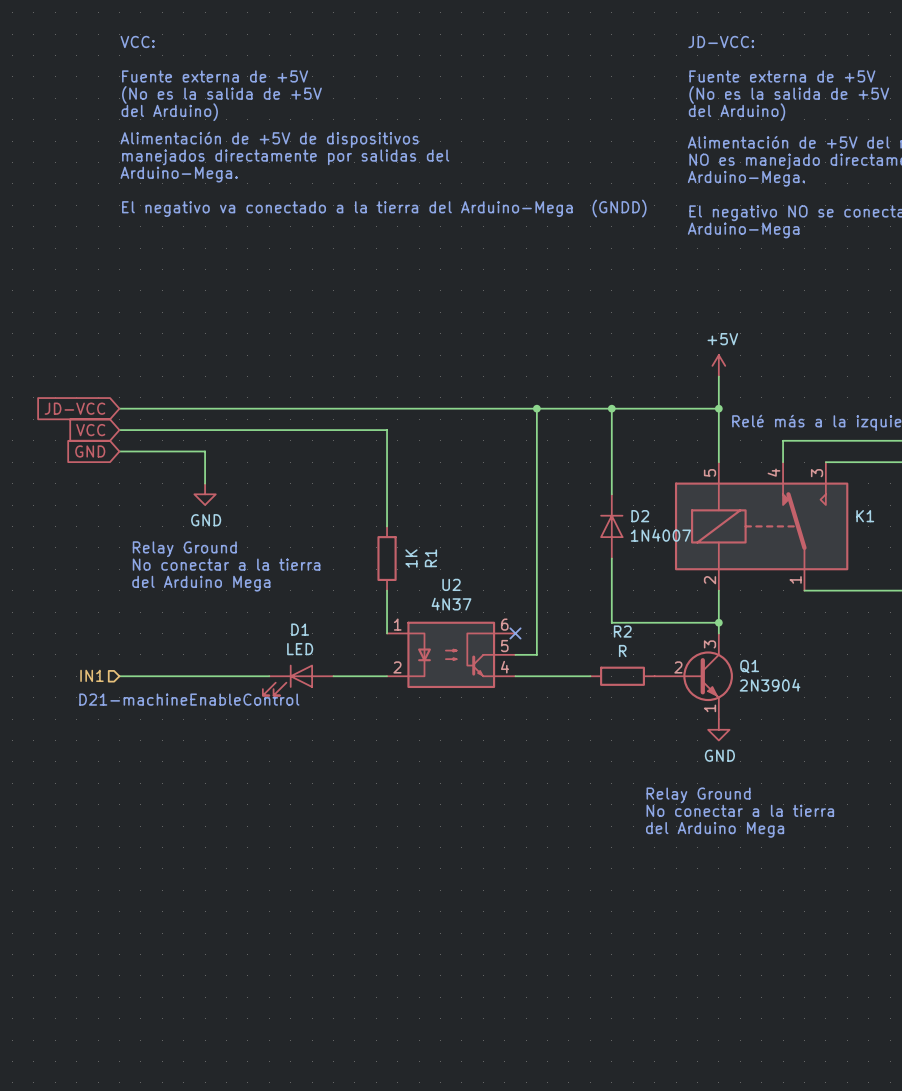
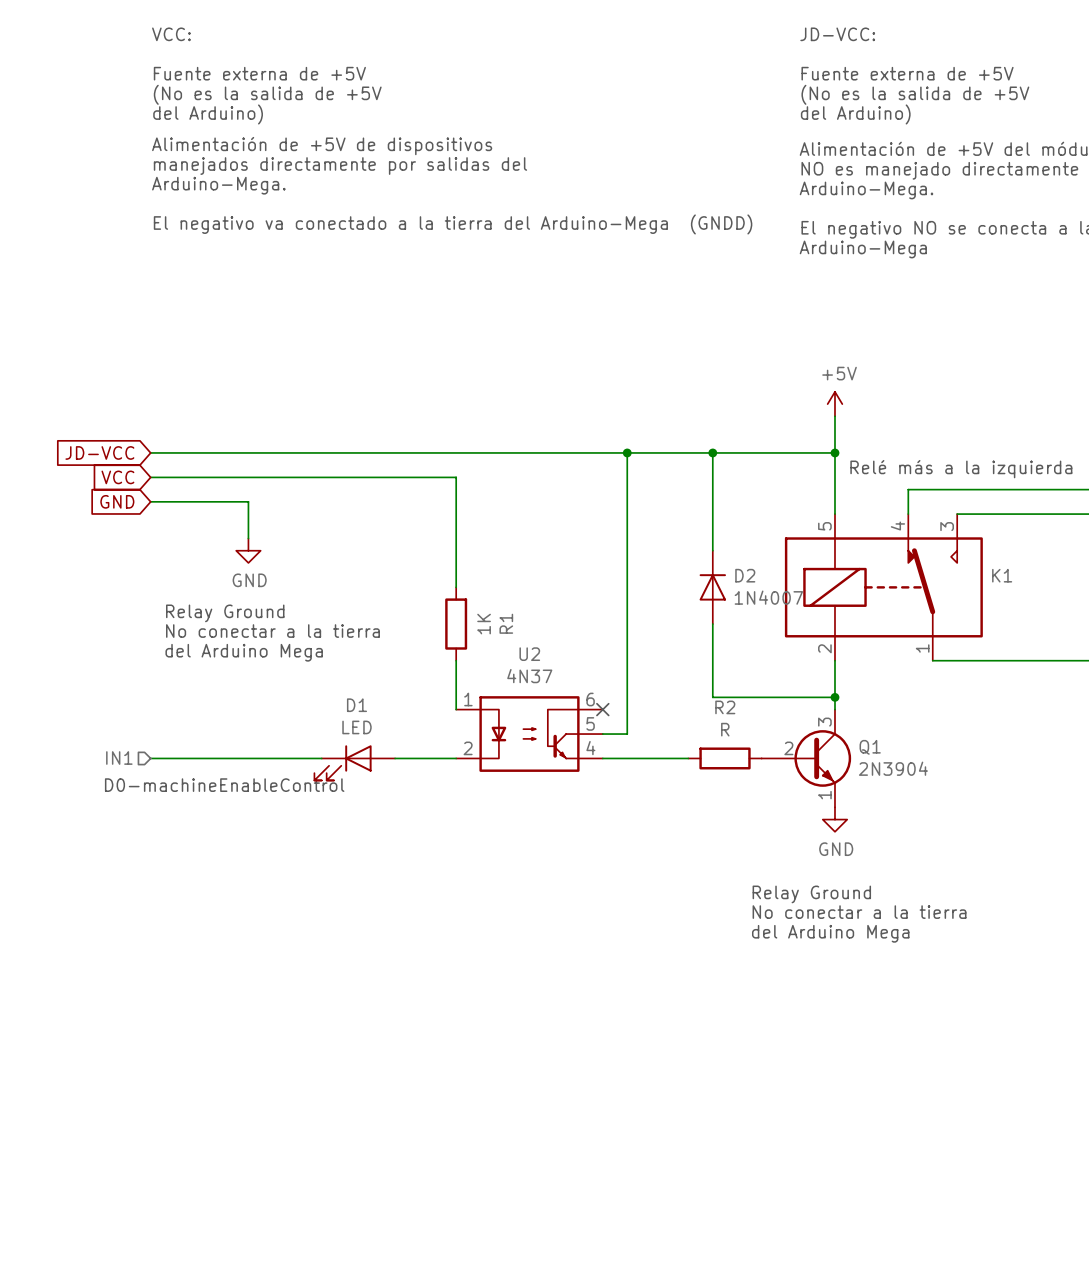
text: D21-machineEnableControl (189, 699) -> D0-machineEnableControl (224, 785)

